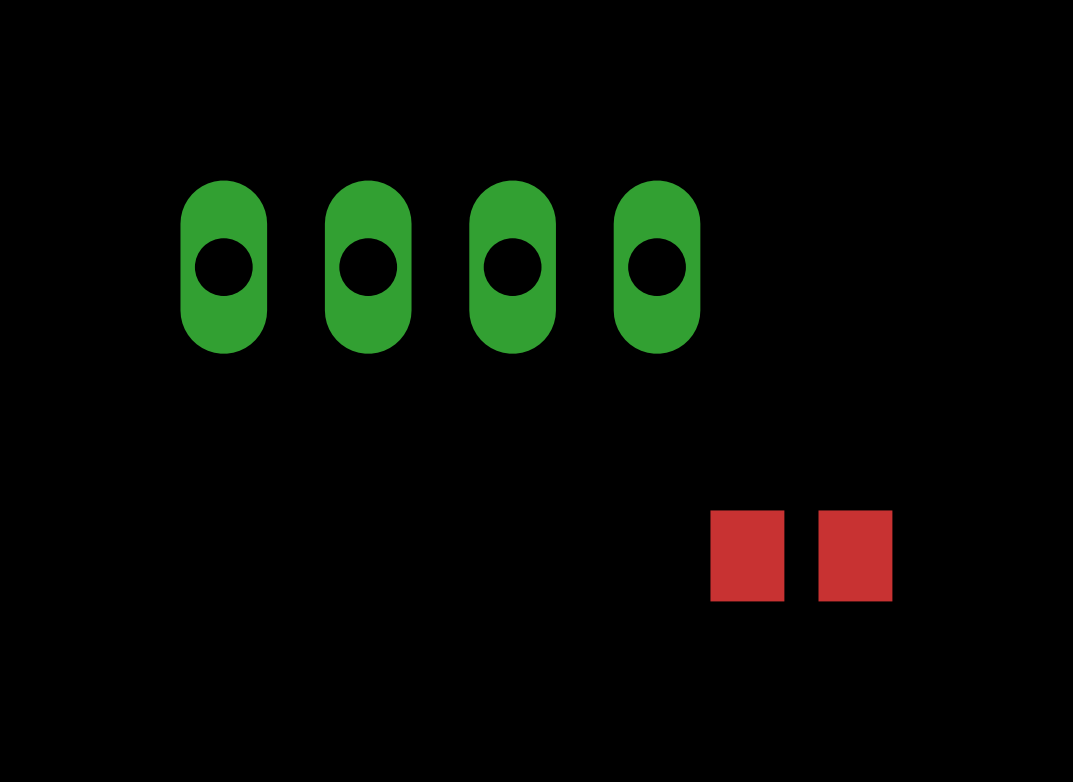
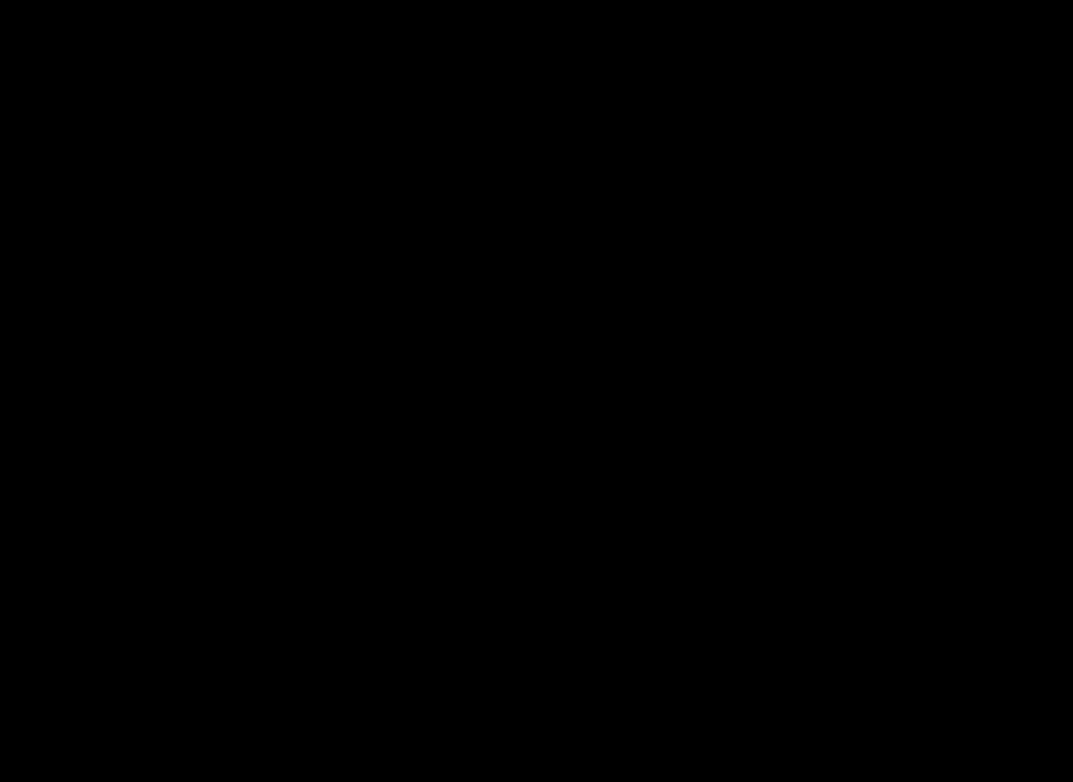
part: (440, 267) -> none
part: (801, 555) -> none

